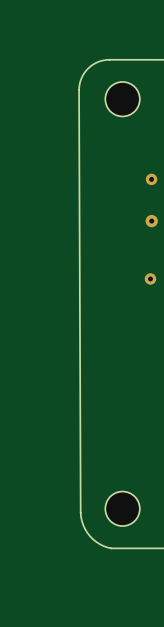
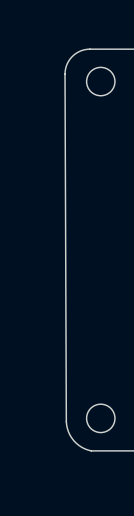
via: (151, 179) -> none
via: (151, 221) -> none
via: (150, 278) -> none

